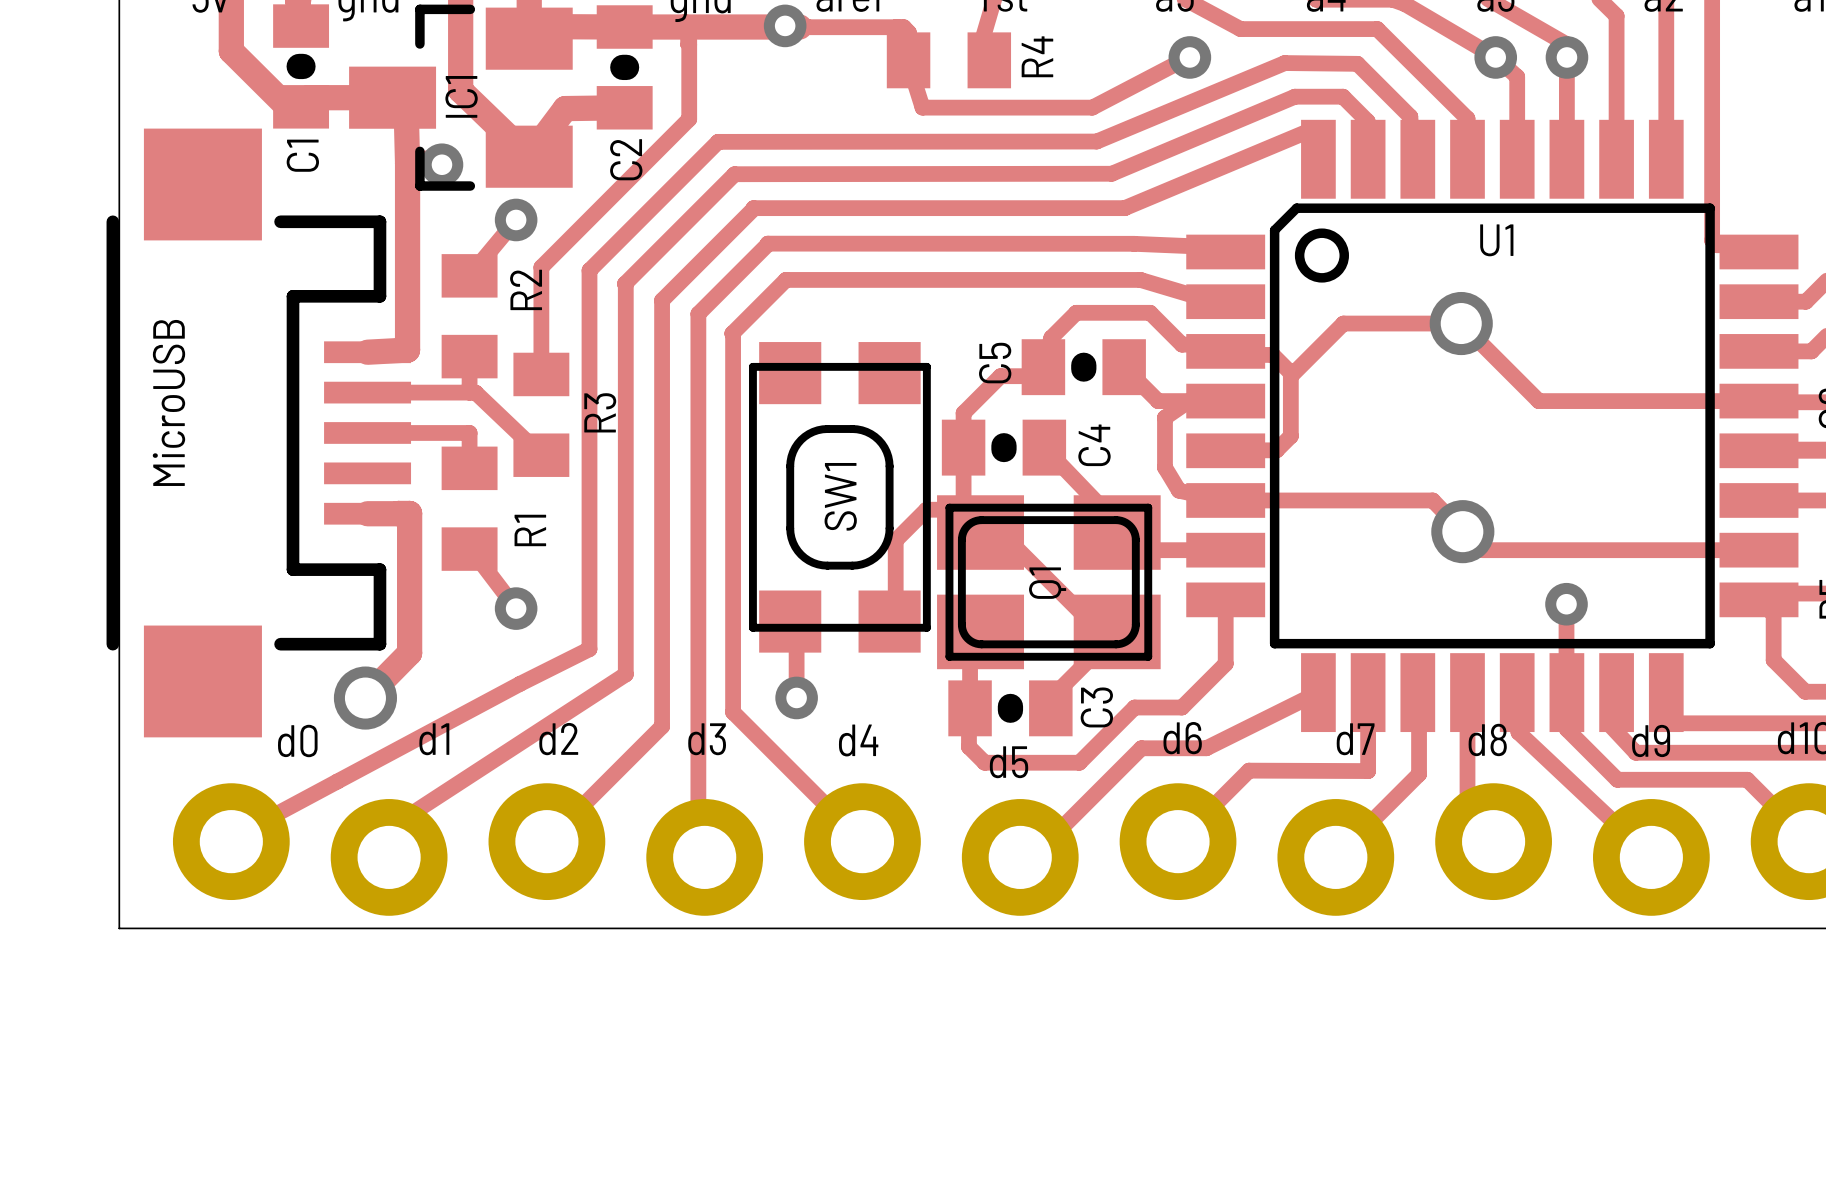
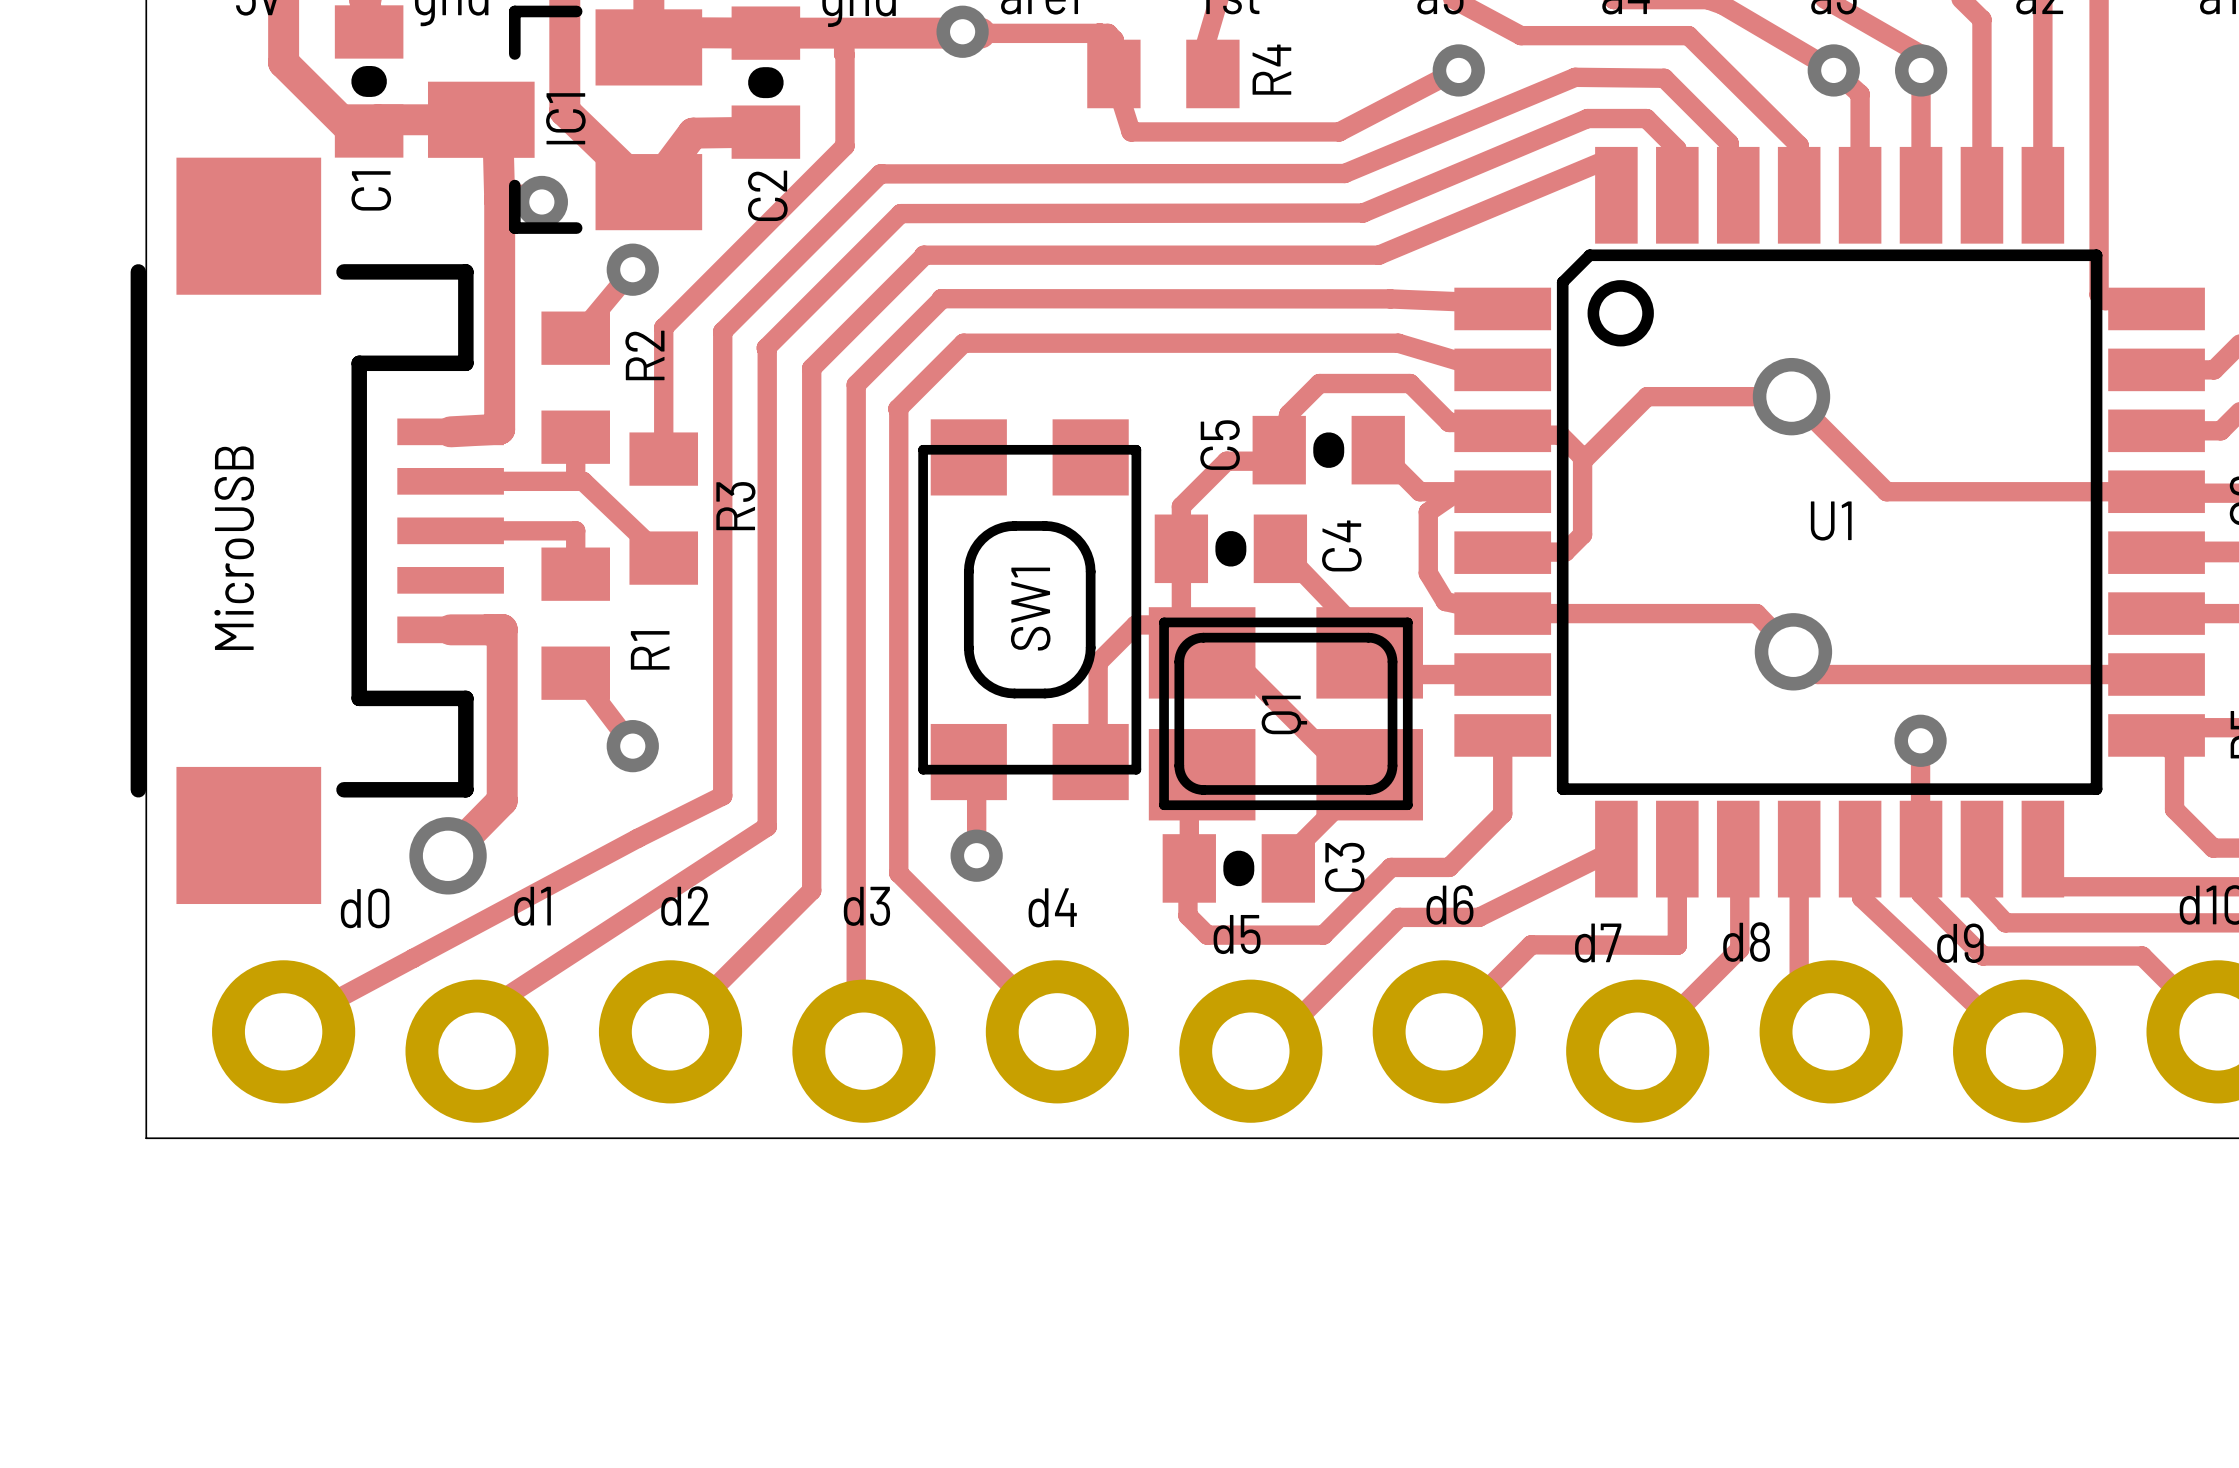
text position: U1 (1496, 240) -> U1 (1831, 521)
text position: MicroUSB (168, 402) -> MicroUSB (234, 548)
text position: d7 (1355, 739) -> d7 (1598, 943)
text position: d8 (1487, 739) -> d8 (1746, 942)
text position: d9 (1651, 740) -> d9 (1960, 943)

